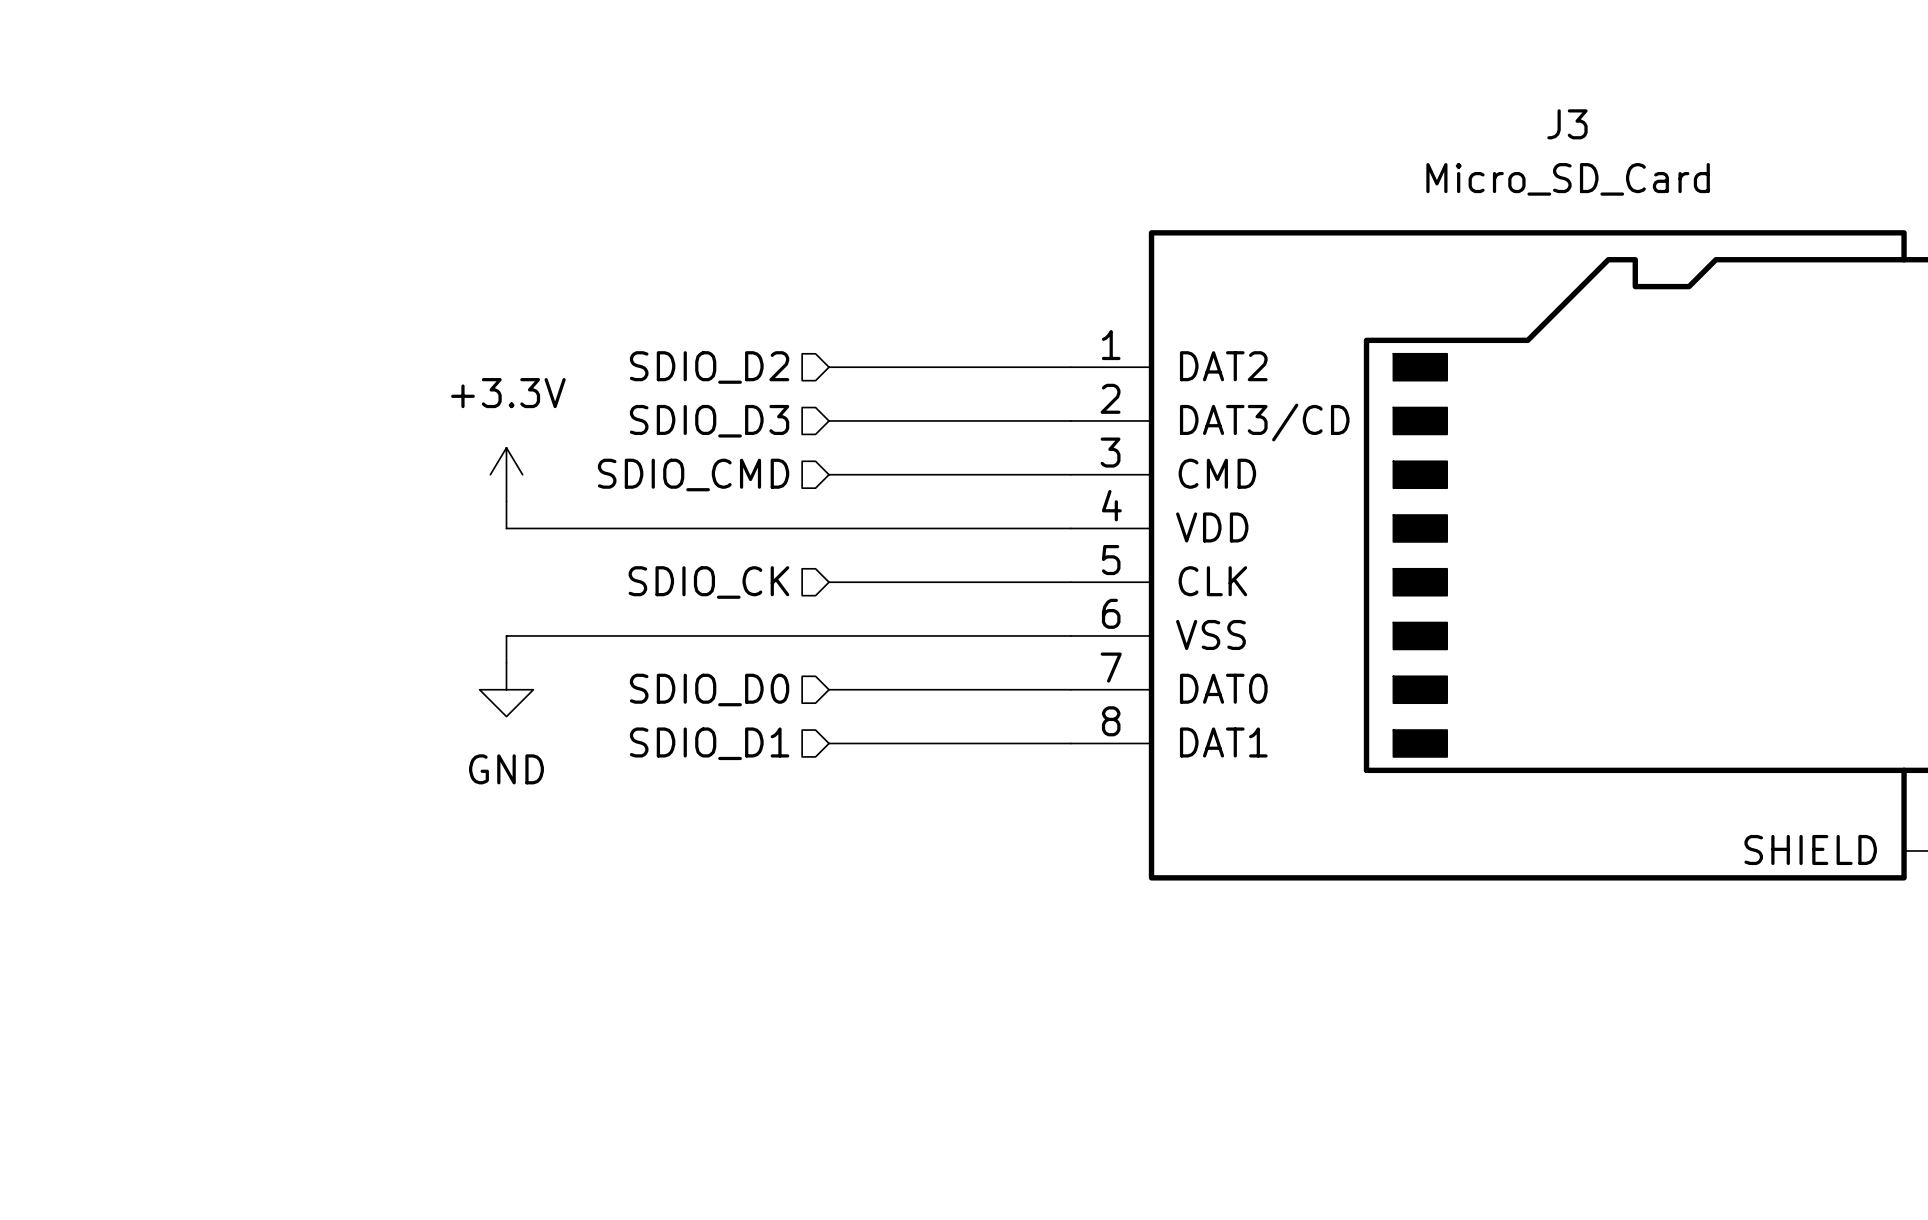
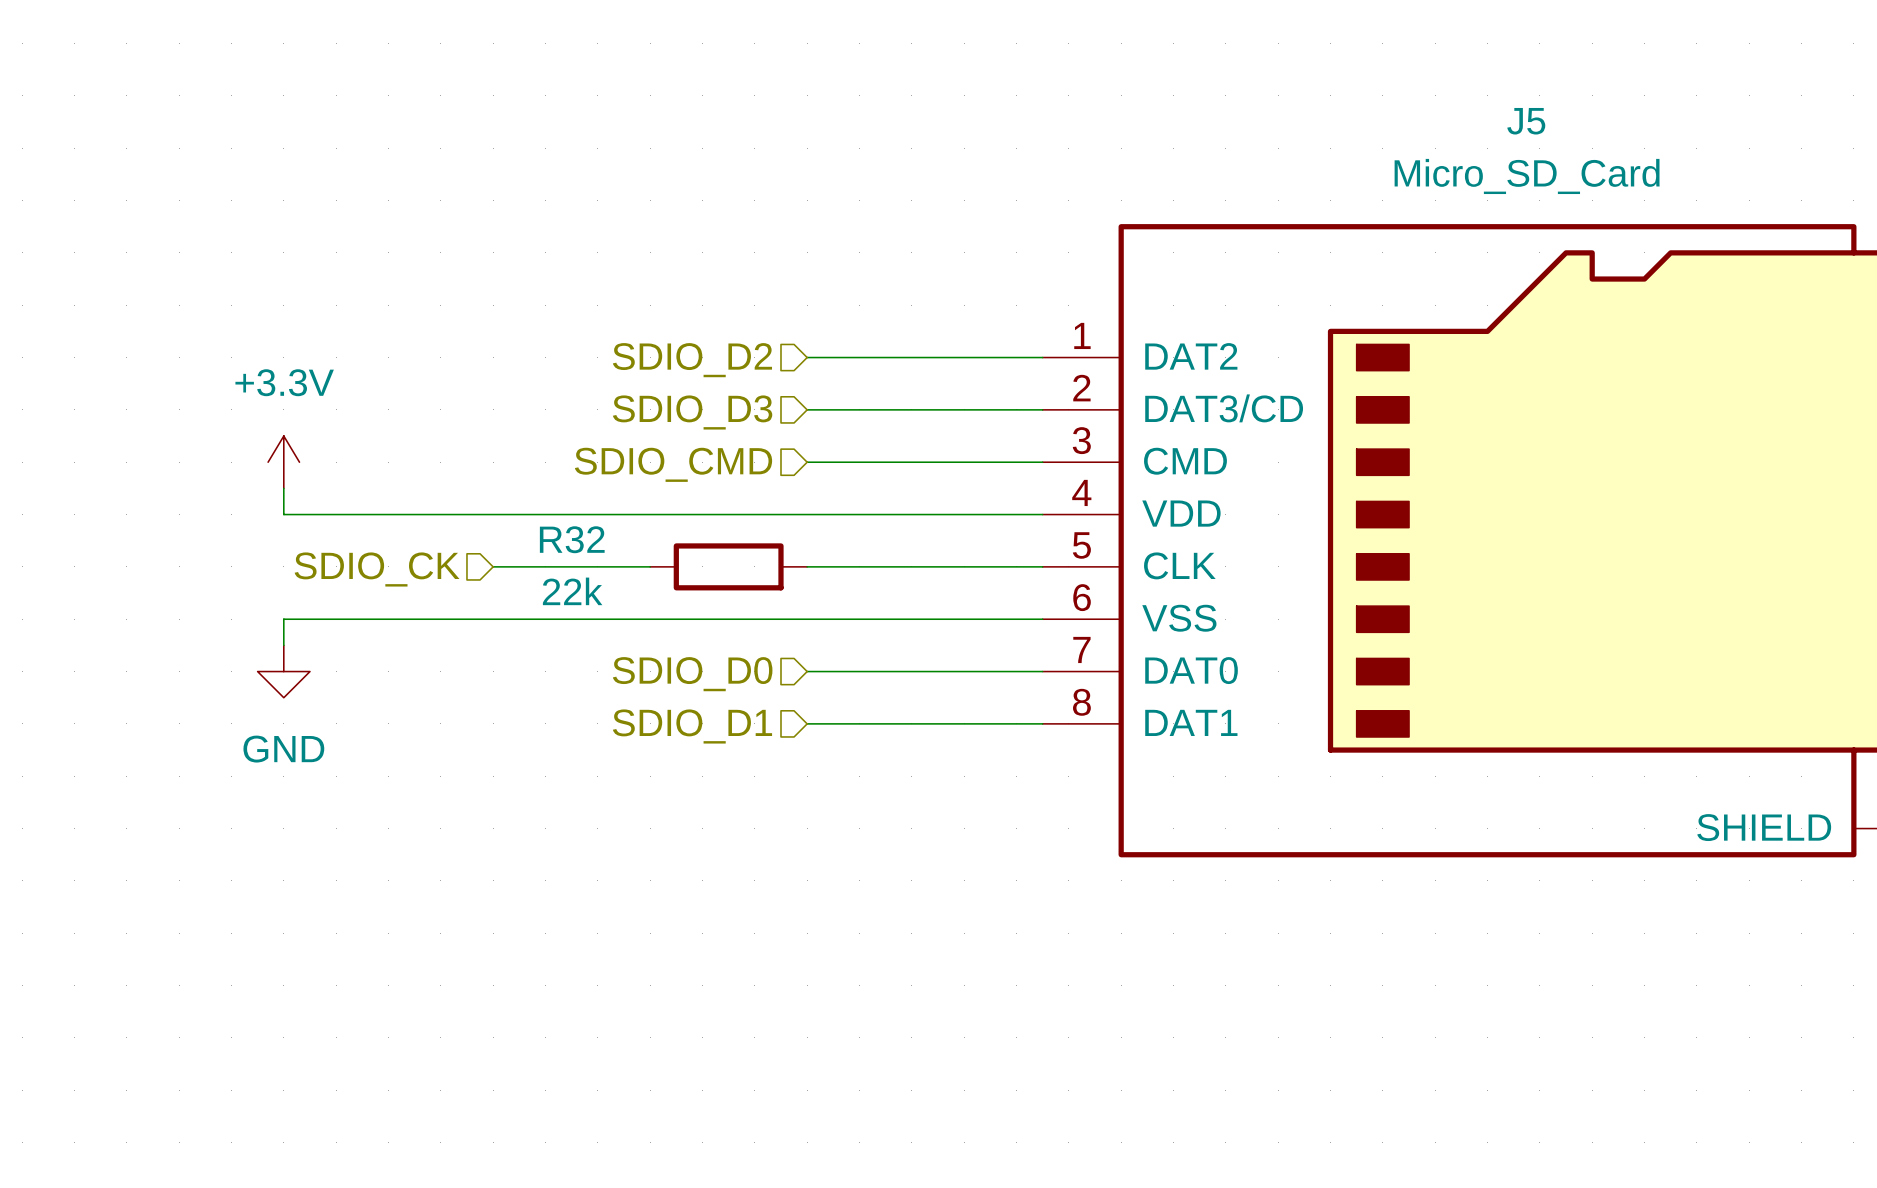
J3 name: J3 (1567, 124) -> J5 (1526, 121)
power symbol position: +3.3V (506, 474) -> +3.3V (283, 462)
wire: (506, 501) (506, 528) -> (283, 488) (283, 514) (493, 514)
wire: none -> (493, 566) (650, 566)
hierarchical label position: SDIO_CK (708, 582) -> SDIO_CK (377, 569)
R32: none -> 22k (728, 566)
wire: (506, 635) (506, 662) -> (493, 619) (283, 619) (283, 645)
power symbol position: GND (506, 689) -> GND (283, 671)

